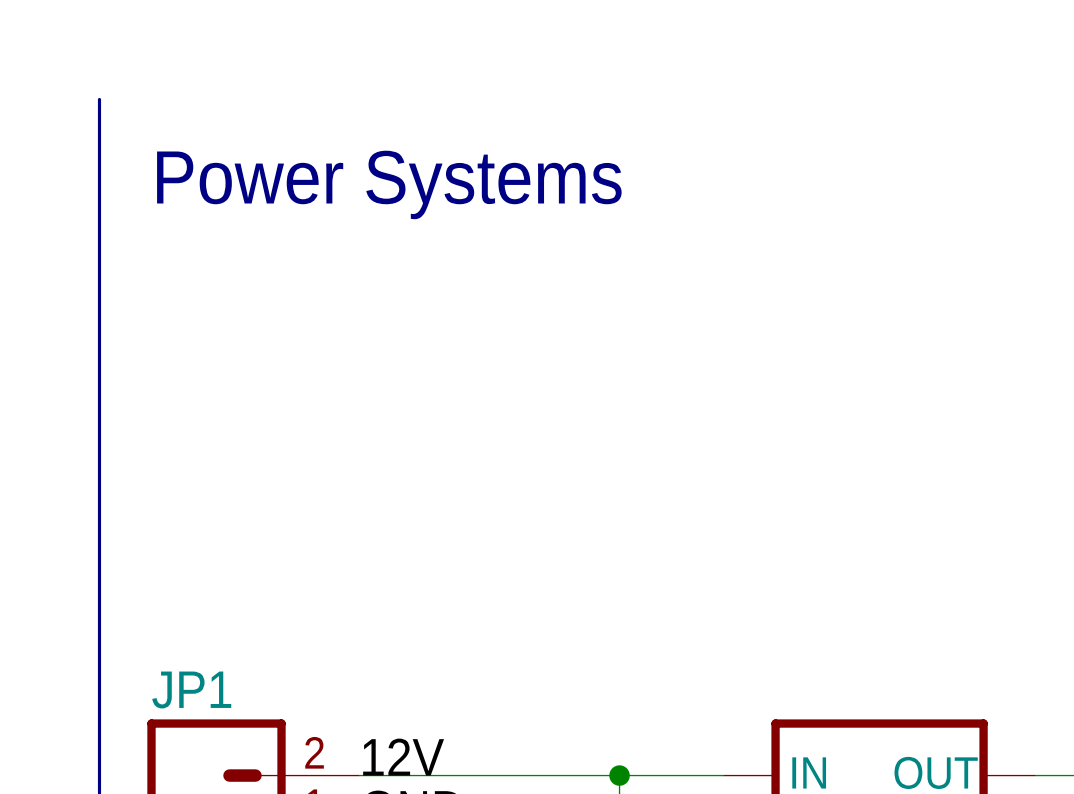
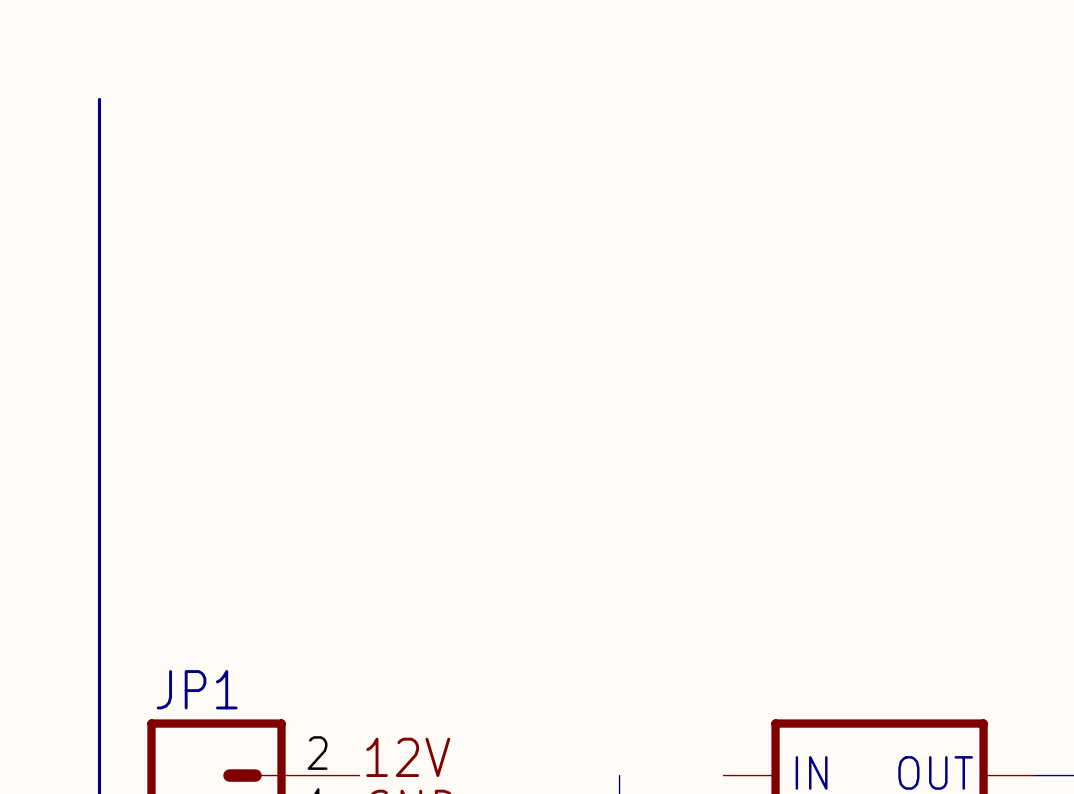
text: Power Systems (389, 184) -> none
wire: (359, 775) (723, 775) -> none
junction: (619, 775) -> none

